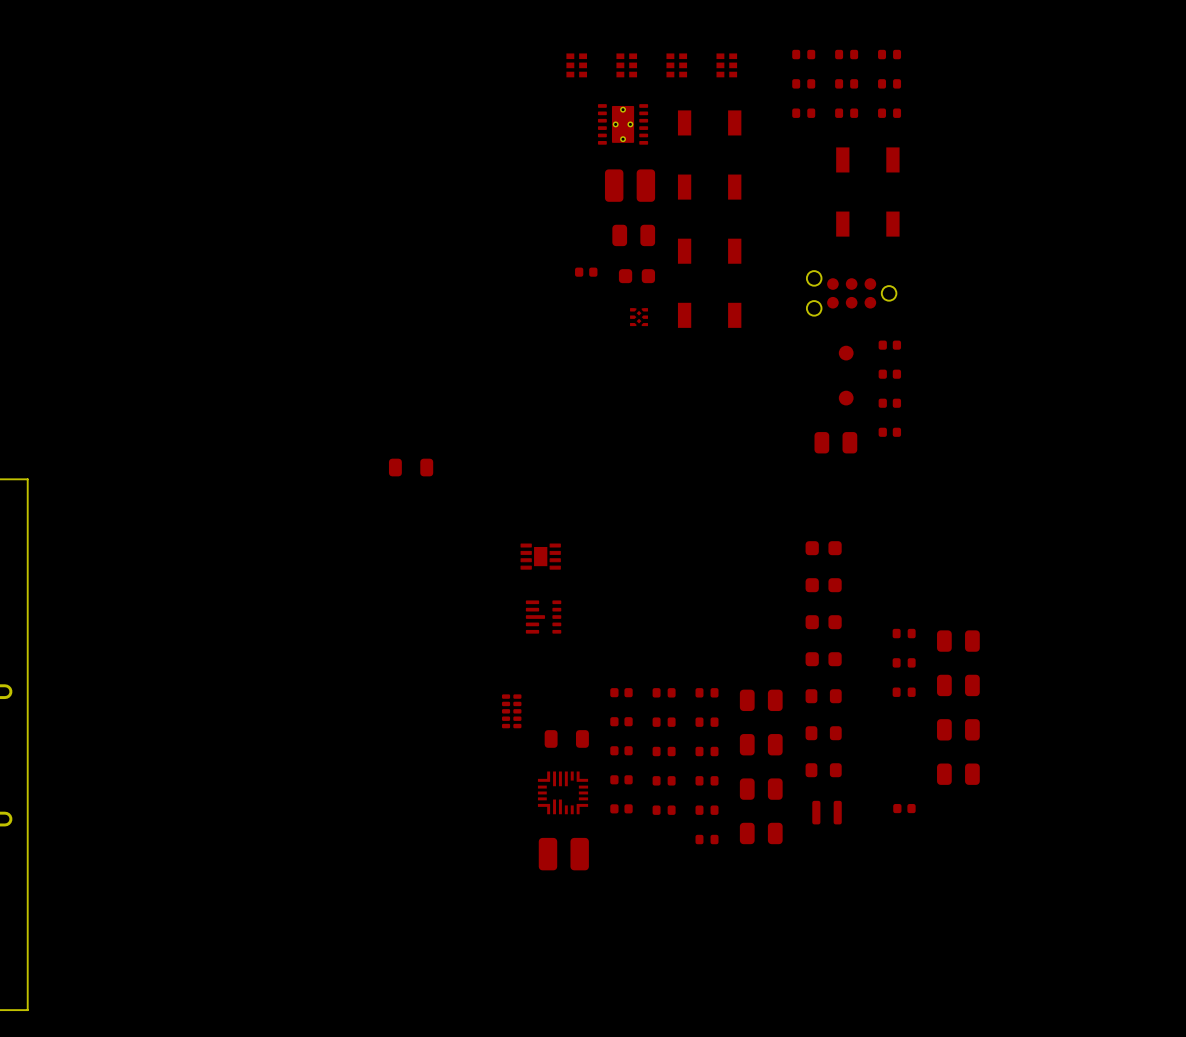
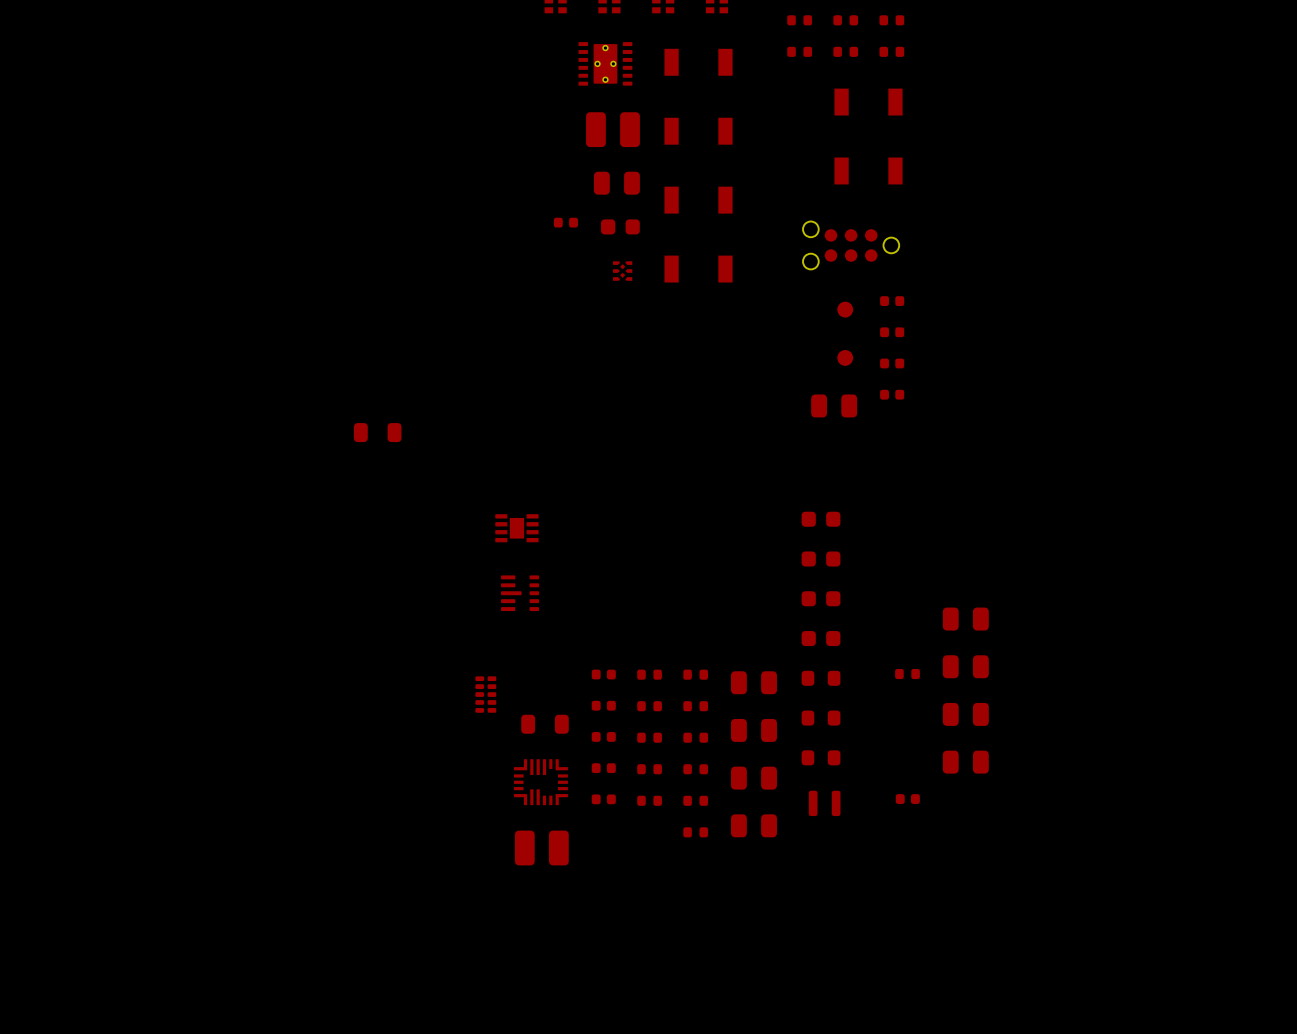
part: (904, 633) -> none
part: (904, 662) -> none

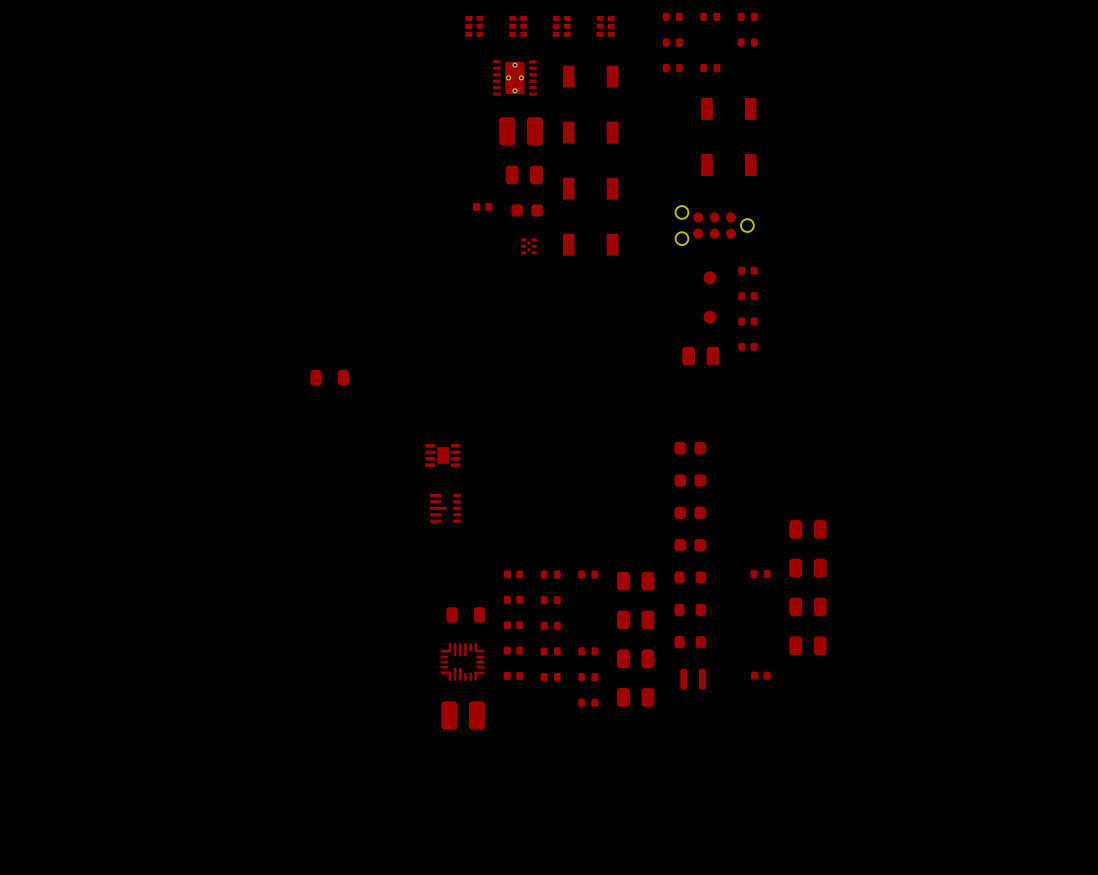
part: (845, 20) -> none
part: (891, 51) -> none
part: (485, 694) -> none
part: (695, 706) -> none
part: (695, 737) -> none

